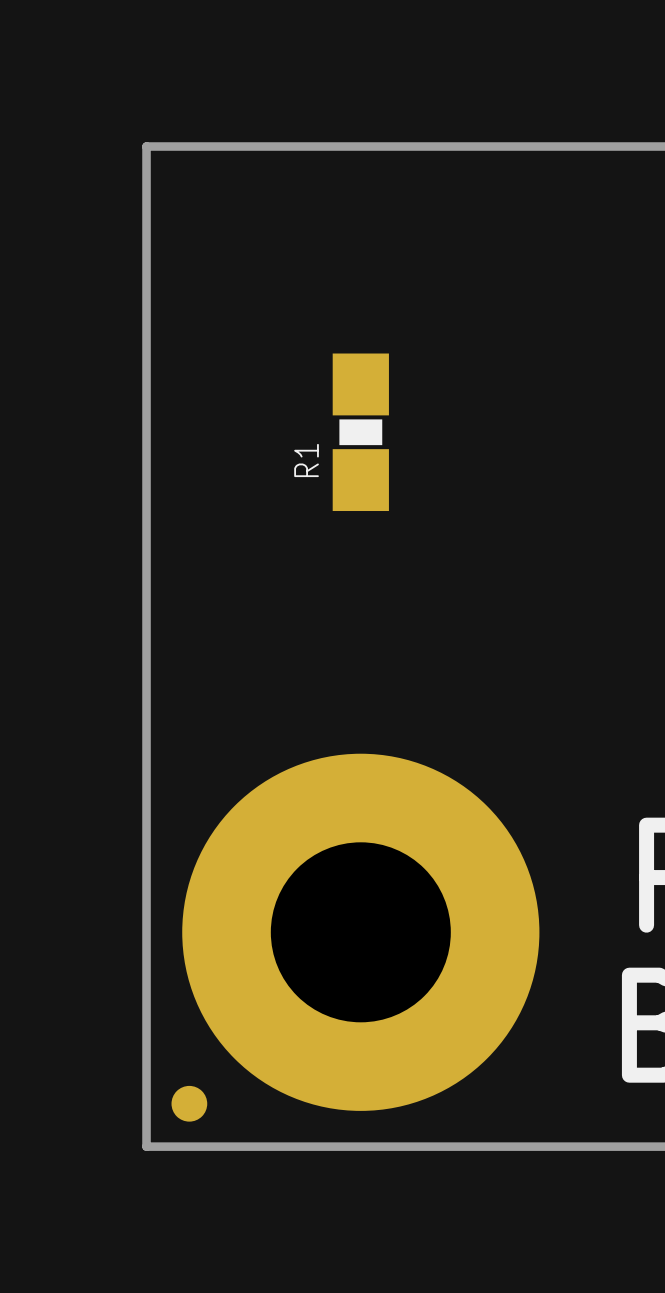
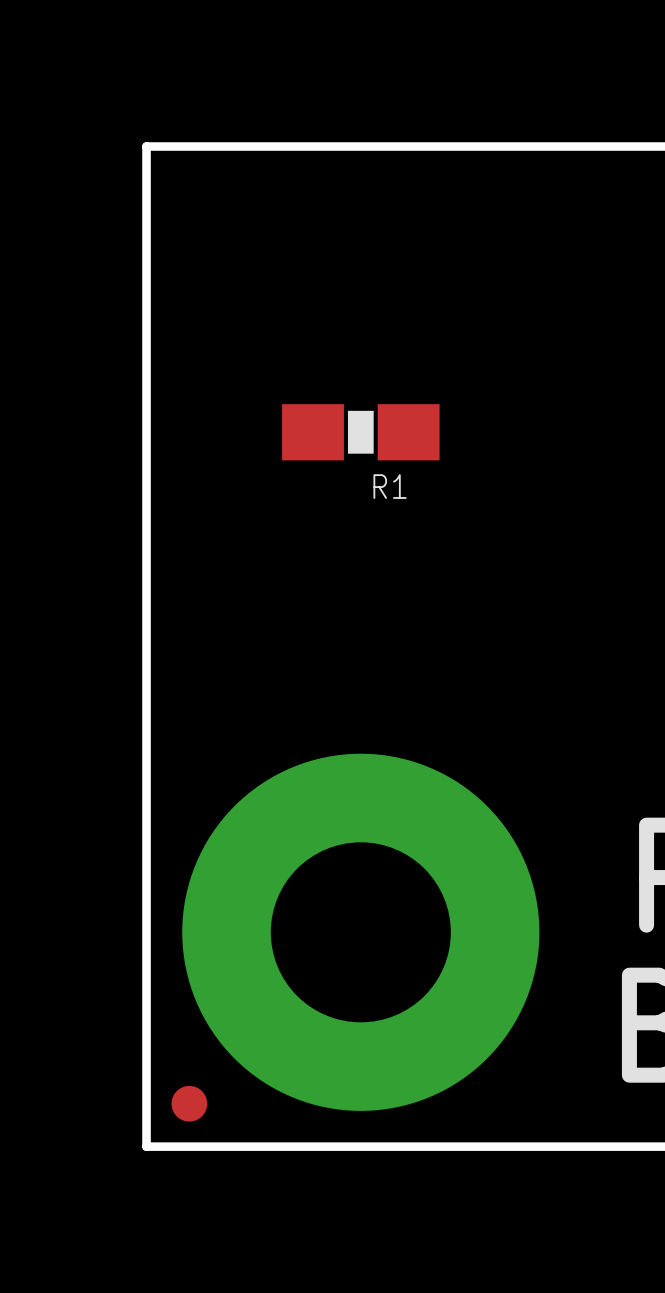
R1 rotation: 0° (360, 432) -> 90° clockwise (360, 432)

